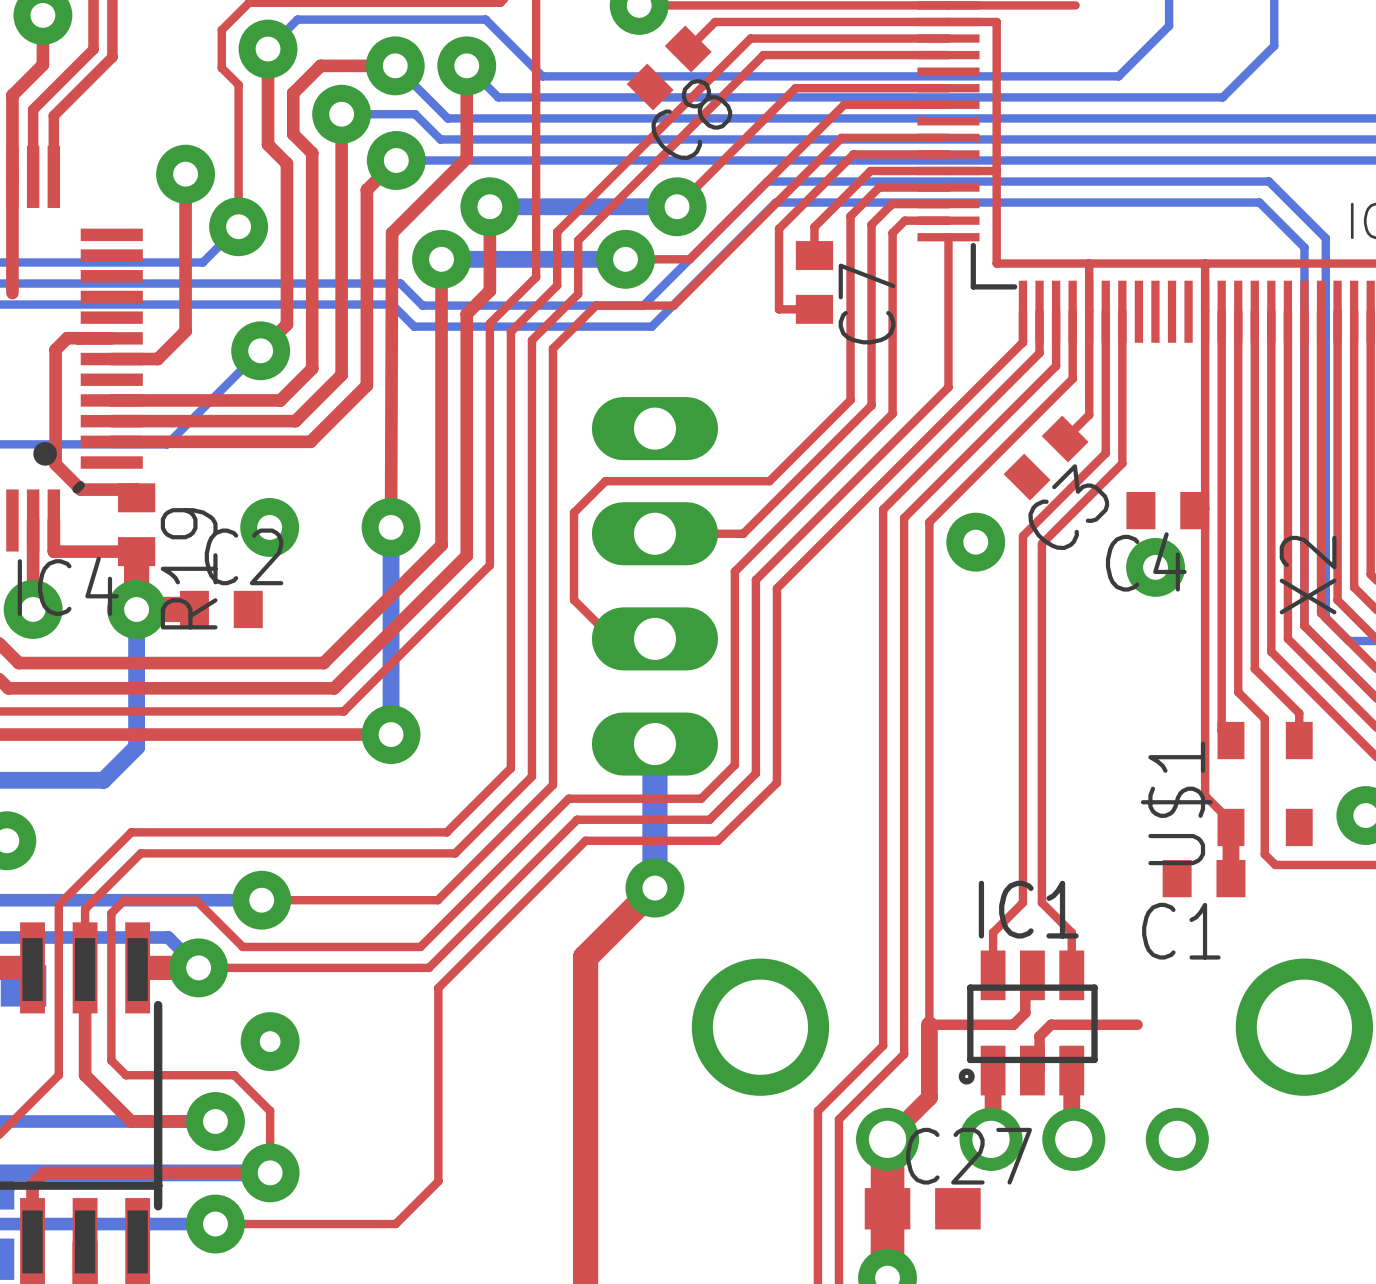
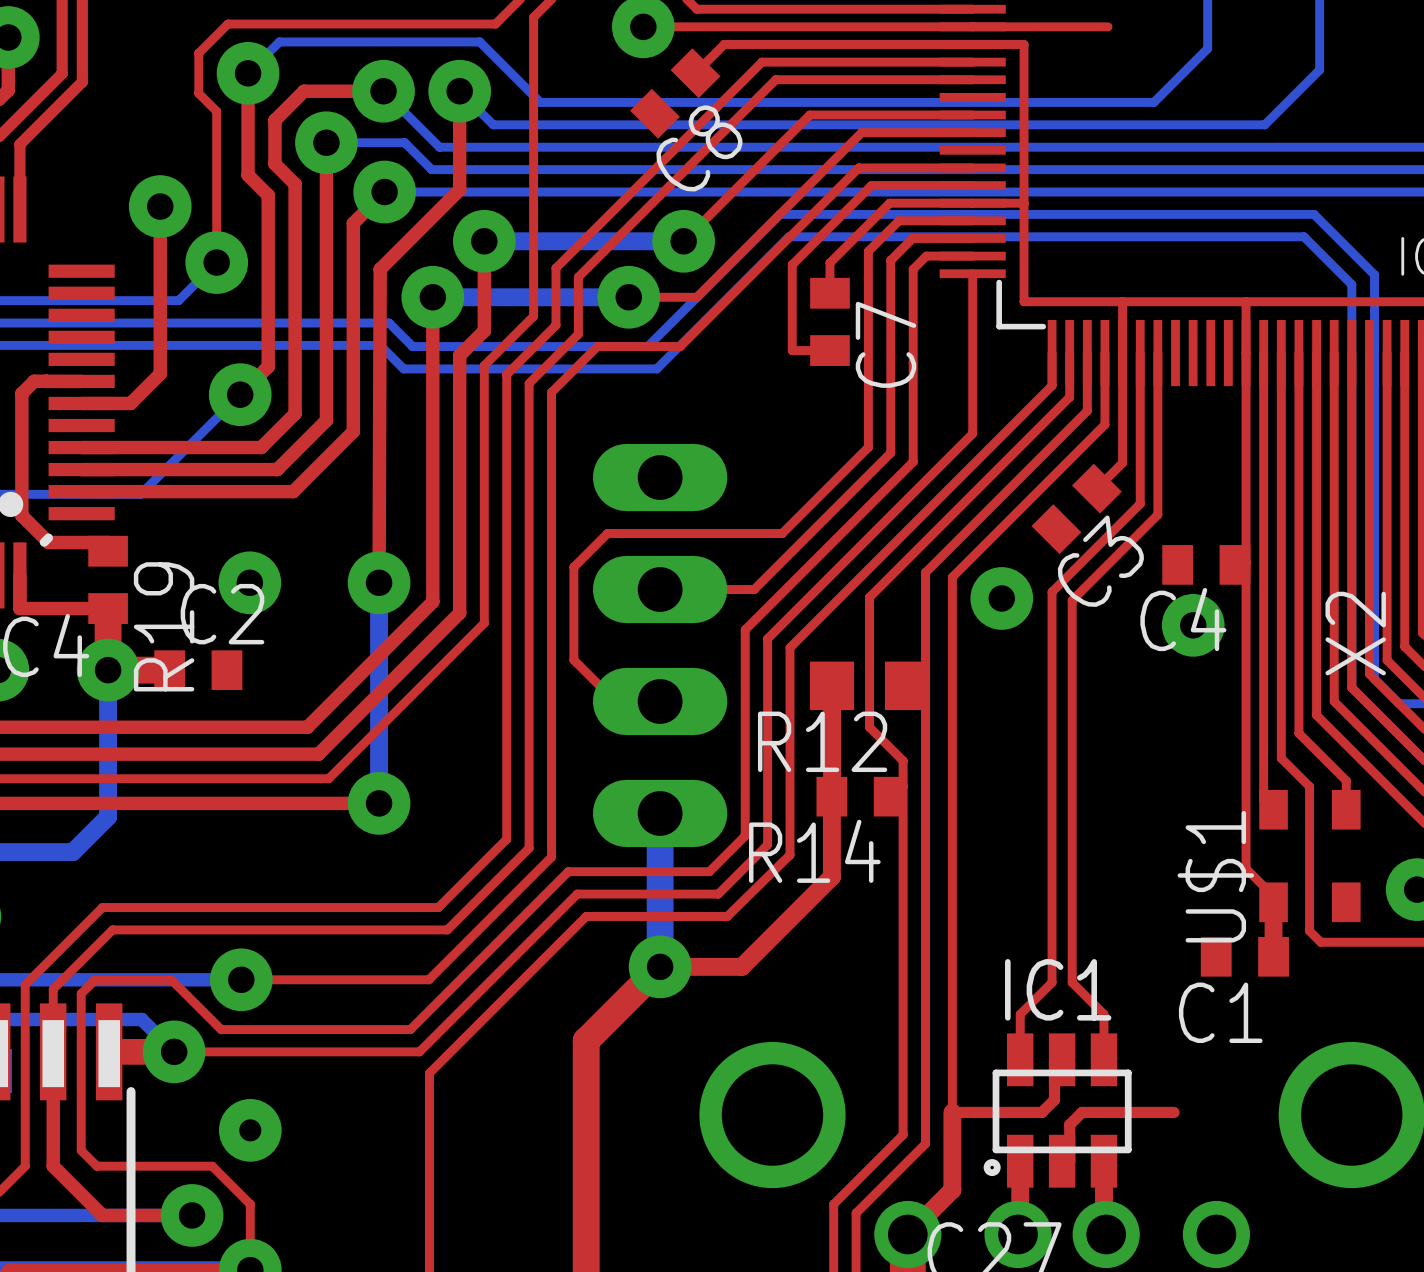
top track: (883, 509) (883, 694) -> (903, 563) (869, 597) (869, 727) (903, 760)
top track: none -> (832, 685) (831, 876) (741, 966) (660, 966)
R12: none -> (869, 685)
R14: none -> (860, 796)

